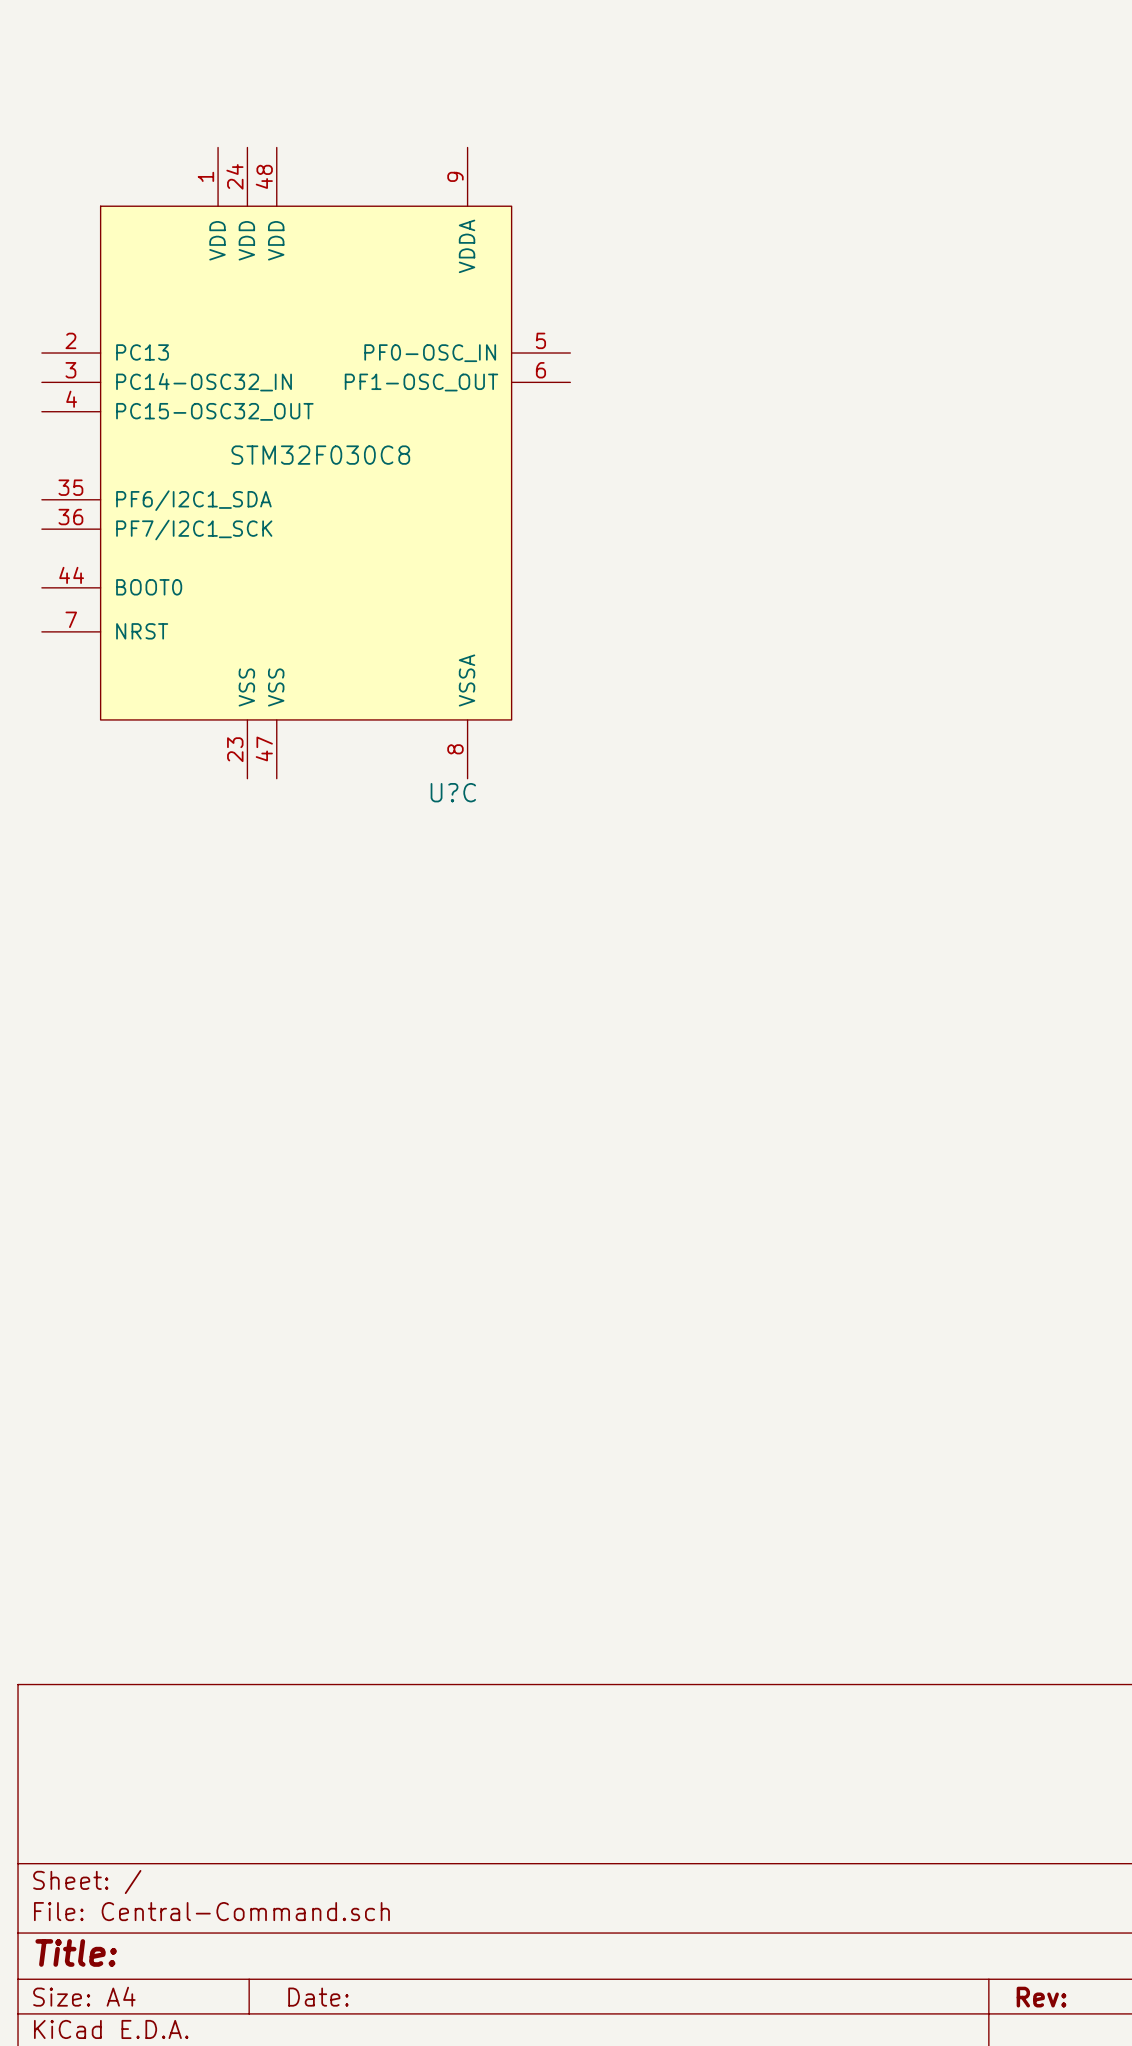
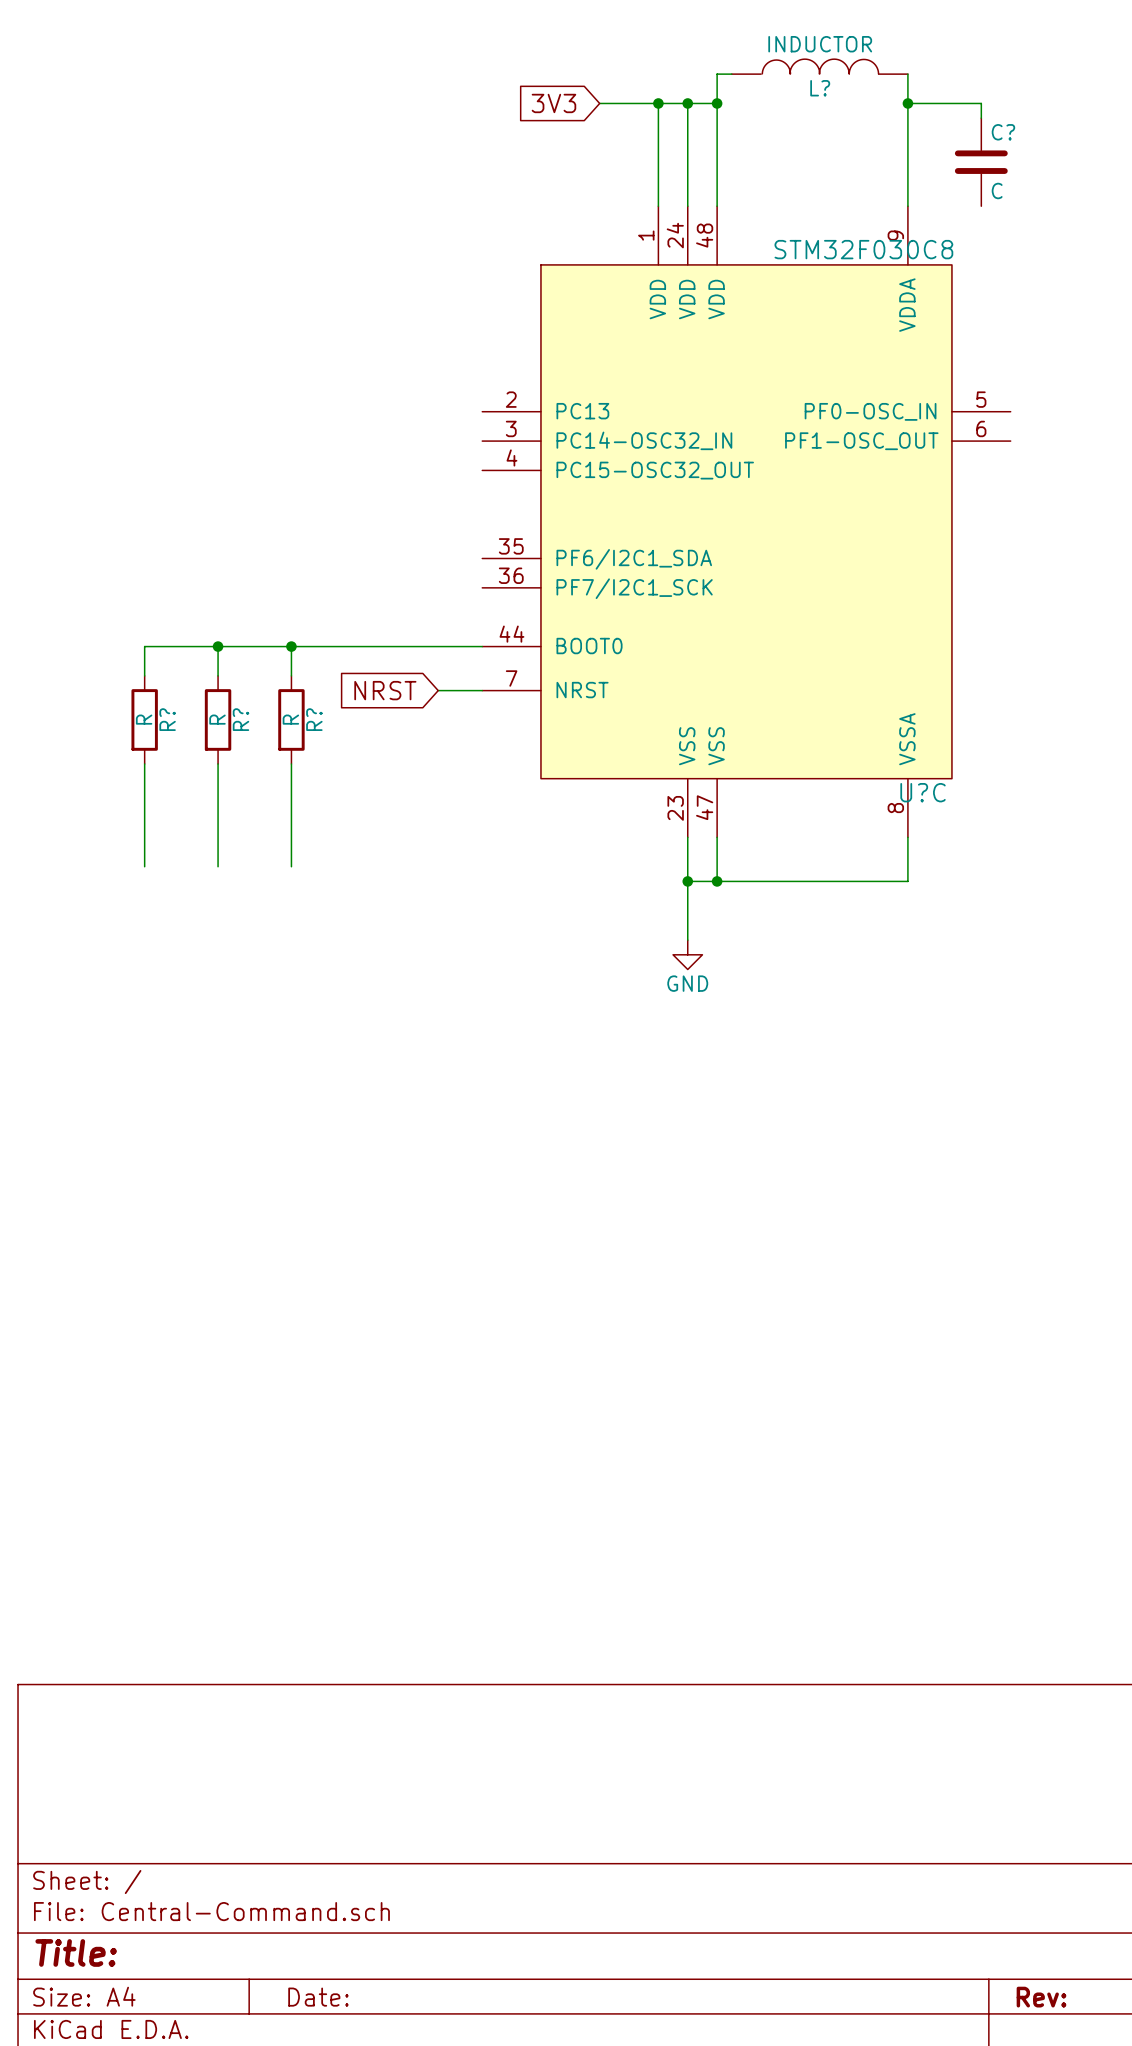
L?: none -> INDUCTOR (819, 66)
wire: none -> (731, 74) (717, 74) (717, 206)
wire: none -> (907, 74) (907, 206)
global label: none -> 3V3 (553, 103)
wire: none -> (599, 103) (717, 103)
wire: none -> (658, 103) (658, 206)
junction: none -> (658, 103)
wire: none -> (687, 103) (687, 206)
junction: none -> (687, 103)
junction: none -> (717, 103)
wire: none -> (907, 103) (981, 103) (981, 118)
junction: none -> (907, 103)
C?: none -> C (981, 162)
U?C: STM32F030C8 (306, 463) -> none
U?C: none -> STM32F030C8 (746, 521)
junction: none -> (218, 646)
junction: none -> (291, 646)
global label: none -> NRST (385, 690)
R?: none -> R (144, 719)
R?: none -> R (218, 719)
R?: none -> R (291, 719)
wire: none -> (144, 763) (144, 866)
wire: none -> (218, 763) (218, 866)
wire: none -> (291, 763) (291, 866)
wire: none -> (687, 837) (687, 940)
wire: none -> (717, 837) (717, 881)
wire: none -> (907, 837) (907, 881) (687, 881)
junction: none -> (687, 881)
junction: none -> (717, 881)
power symbol: none -> GND (687, 954)

